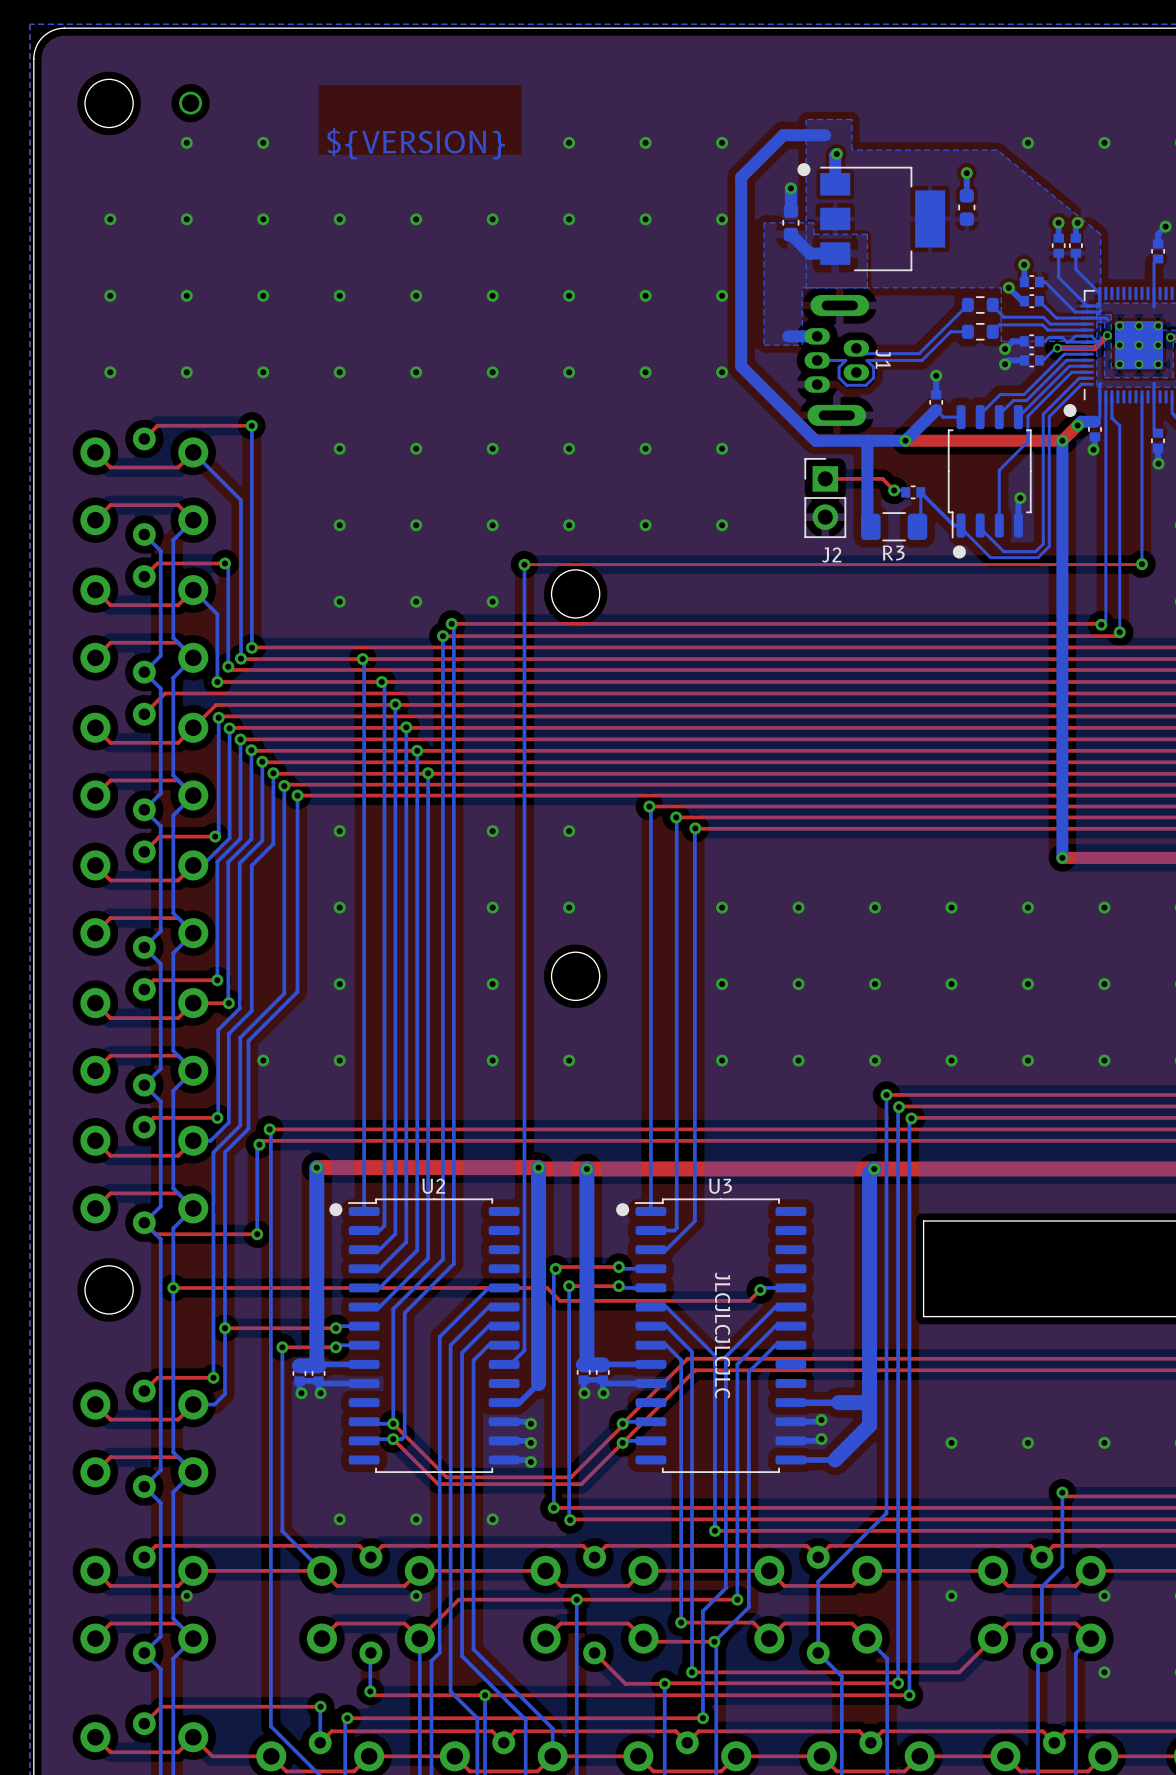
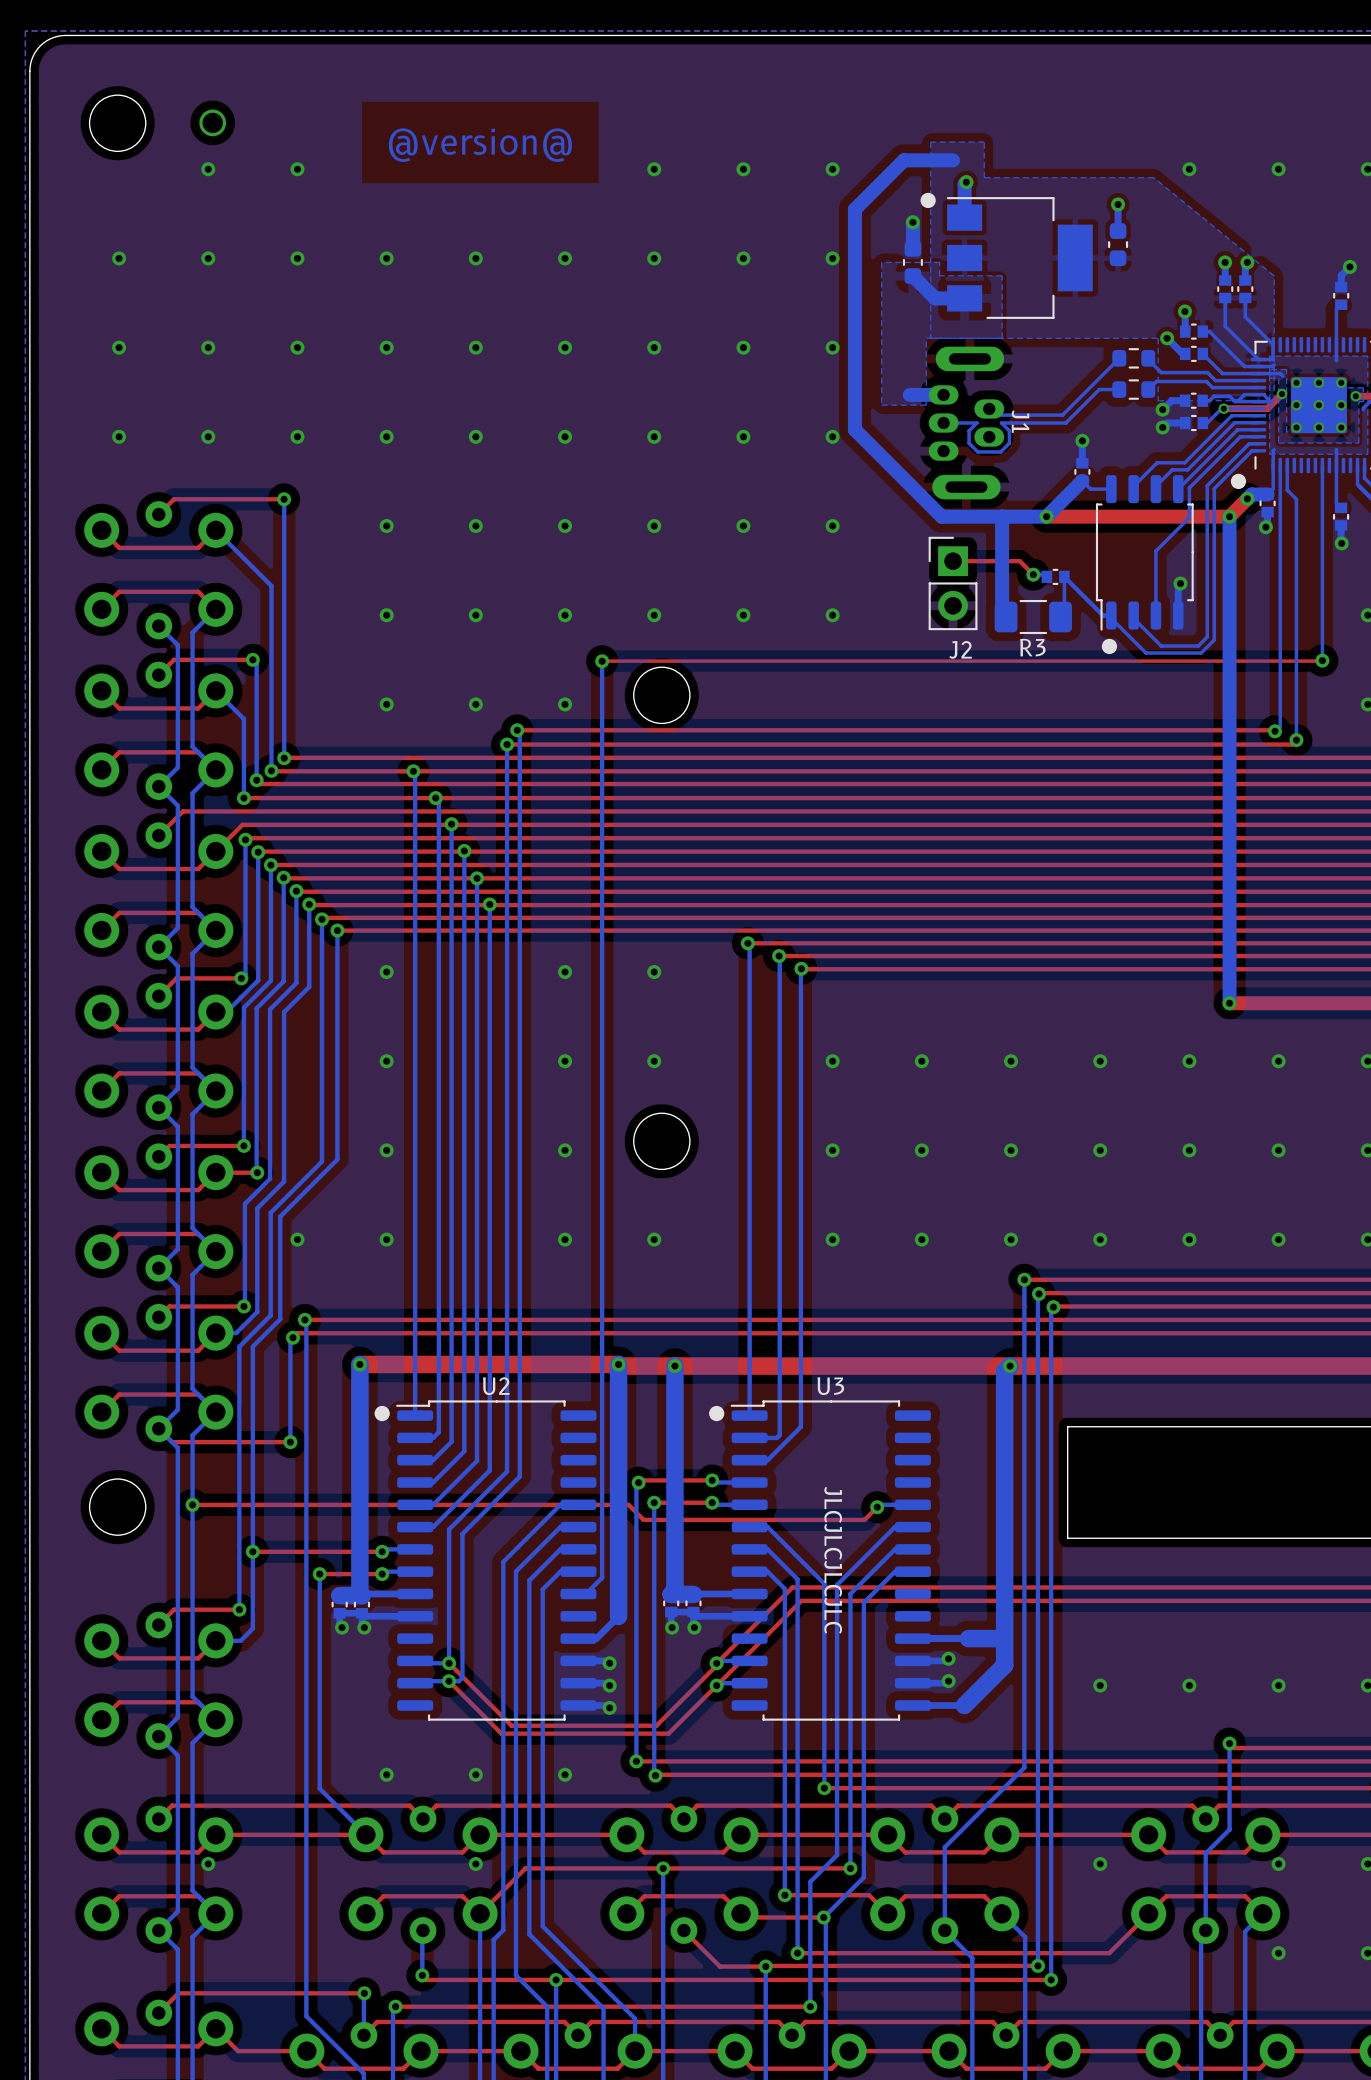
text: none -> @version@ (480, 145)
text: ${VERSION} (416, 143) -> none

